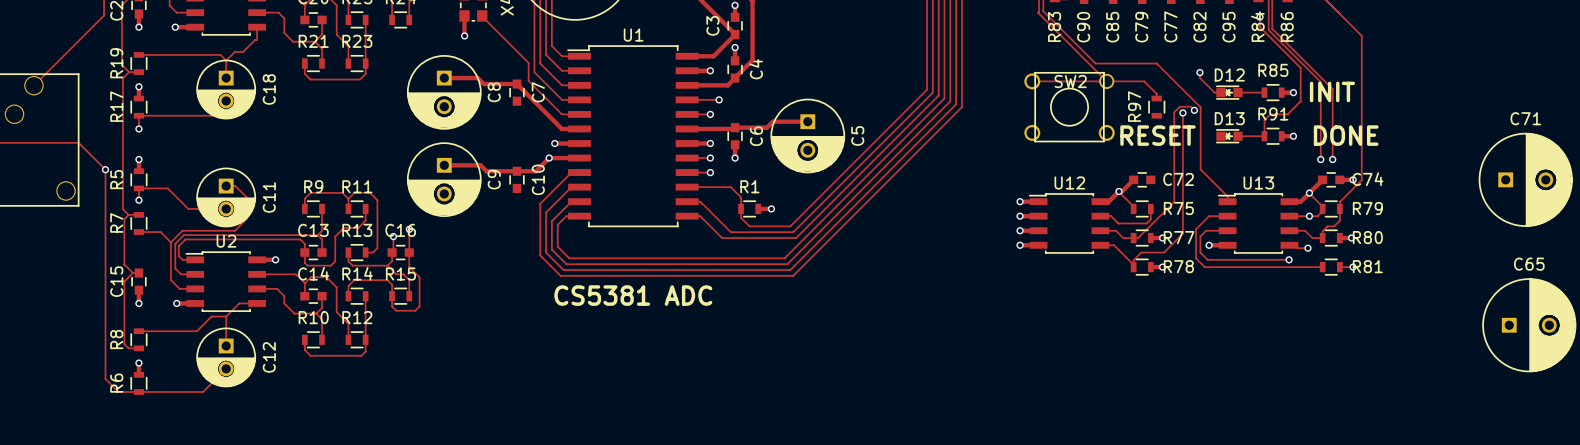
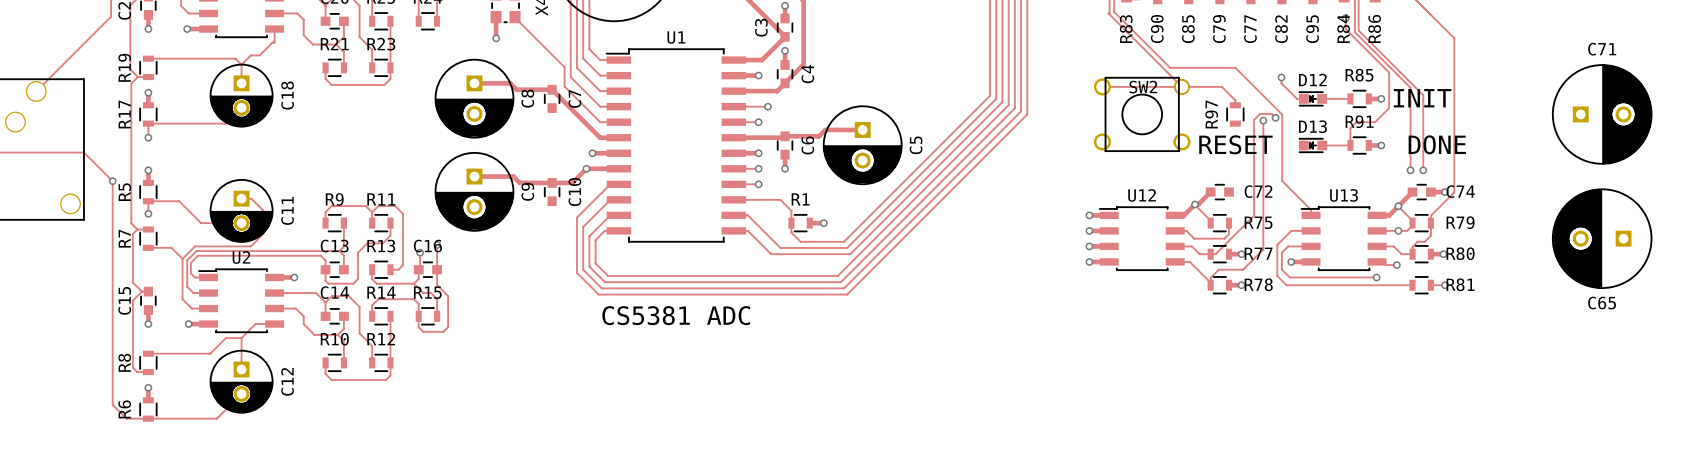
C71 position: (1525, 179) -> (1602, 114)
C65 rotation: 0° (1529, 325) -> 180° (1602, 238)
C65 position: (1529, 325) -> (1602, 238)

